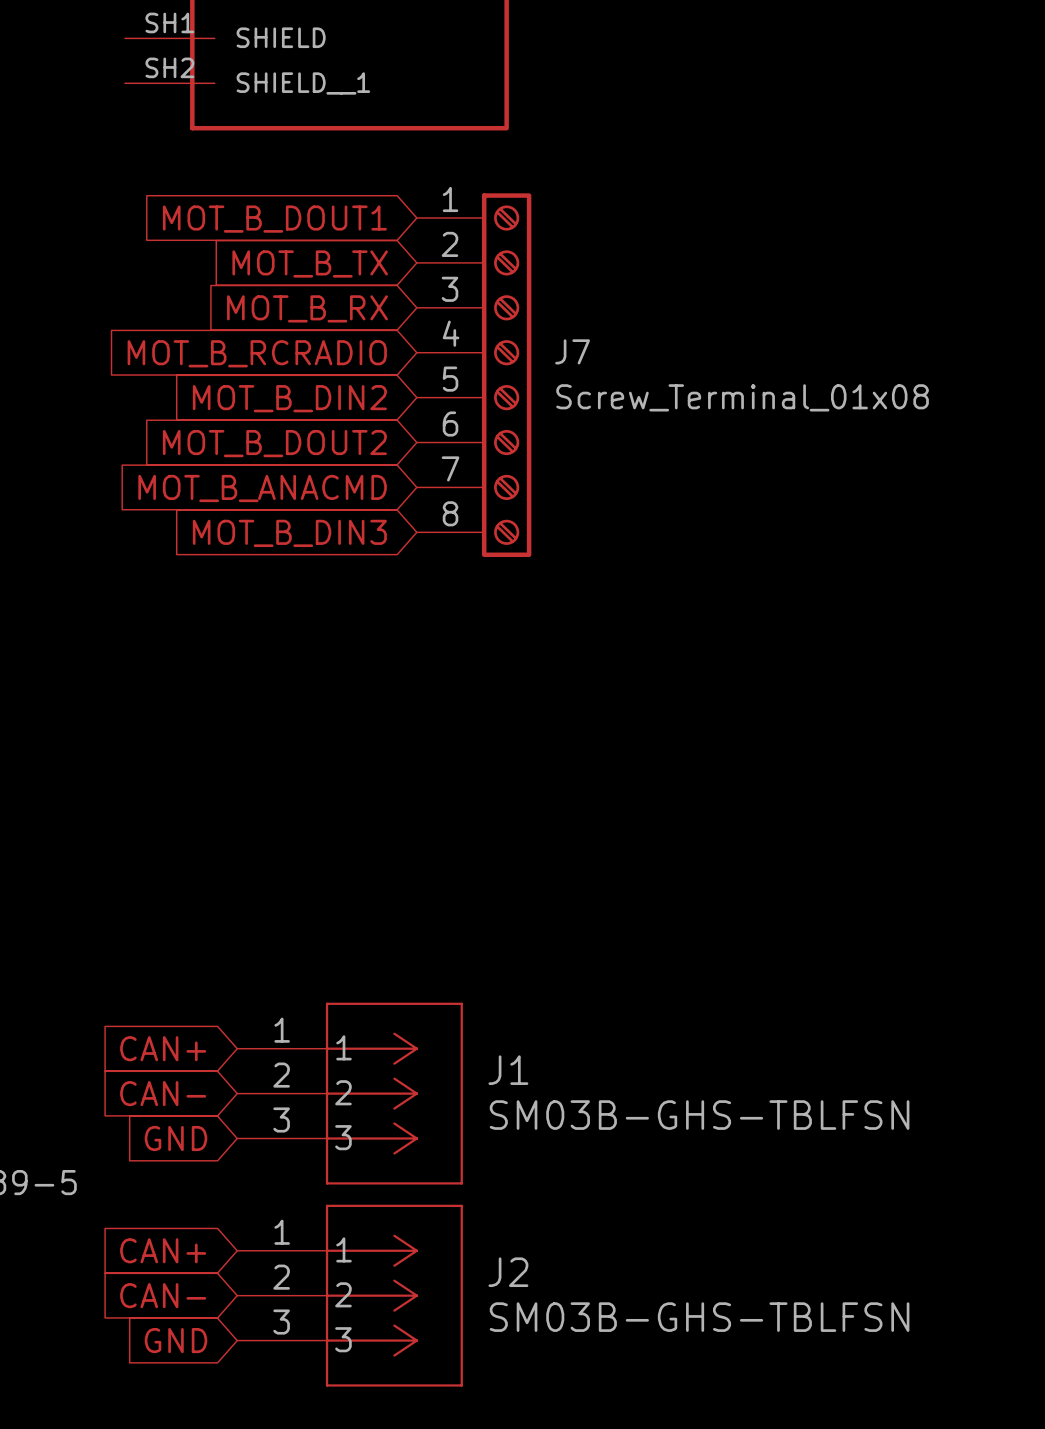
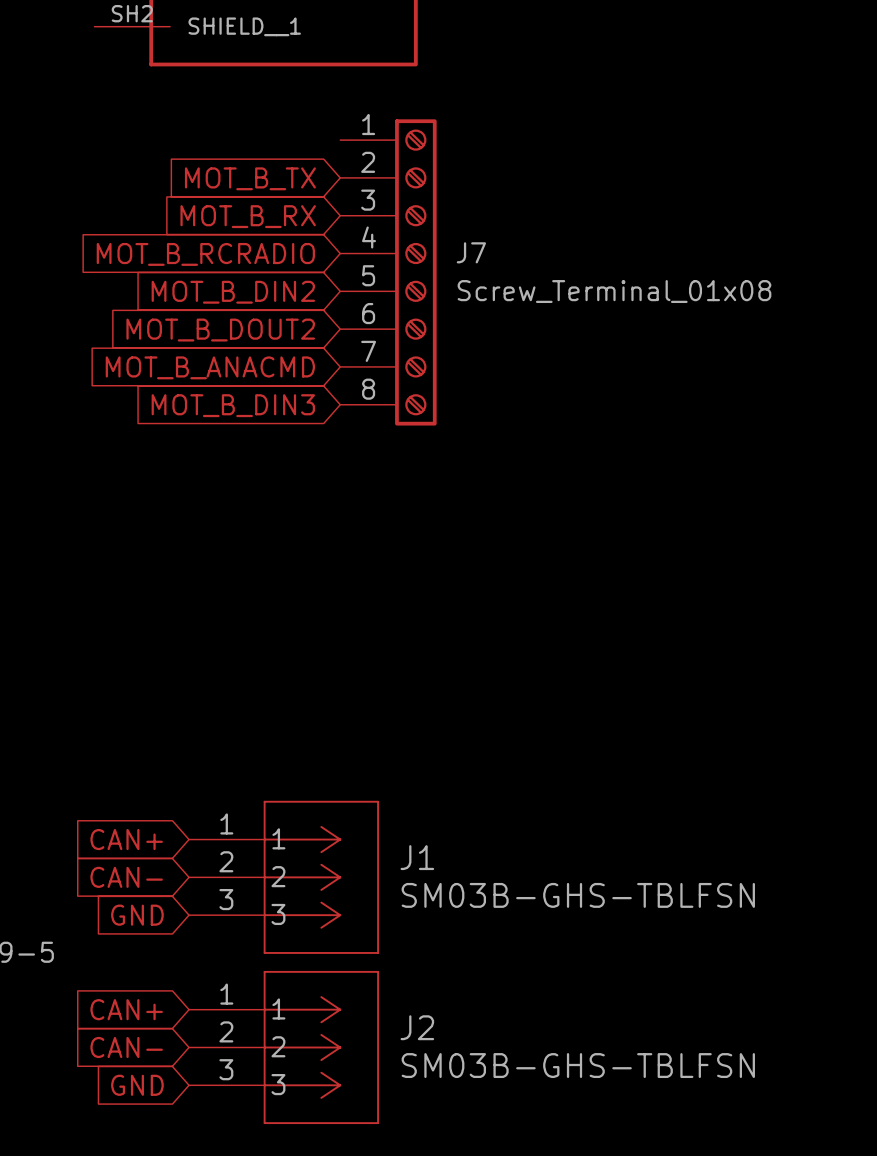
global label: MOT_B_DOUT1 (274, 219) -> none

